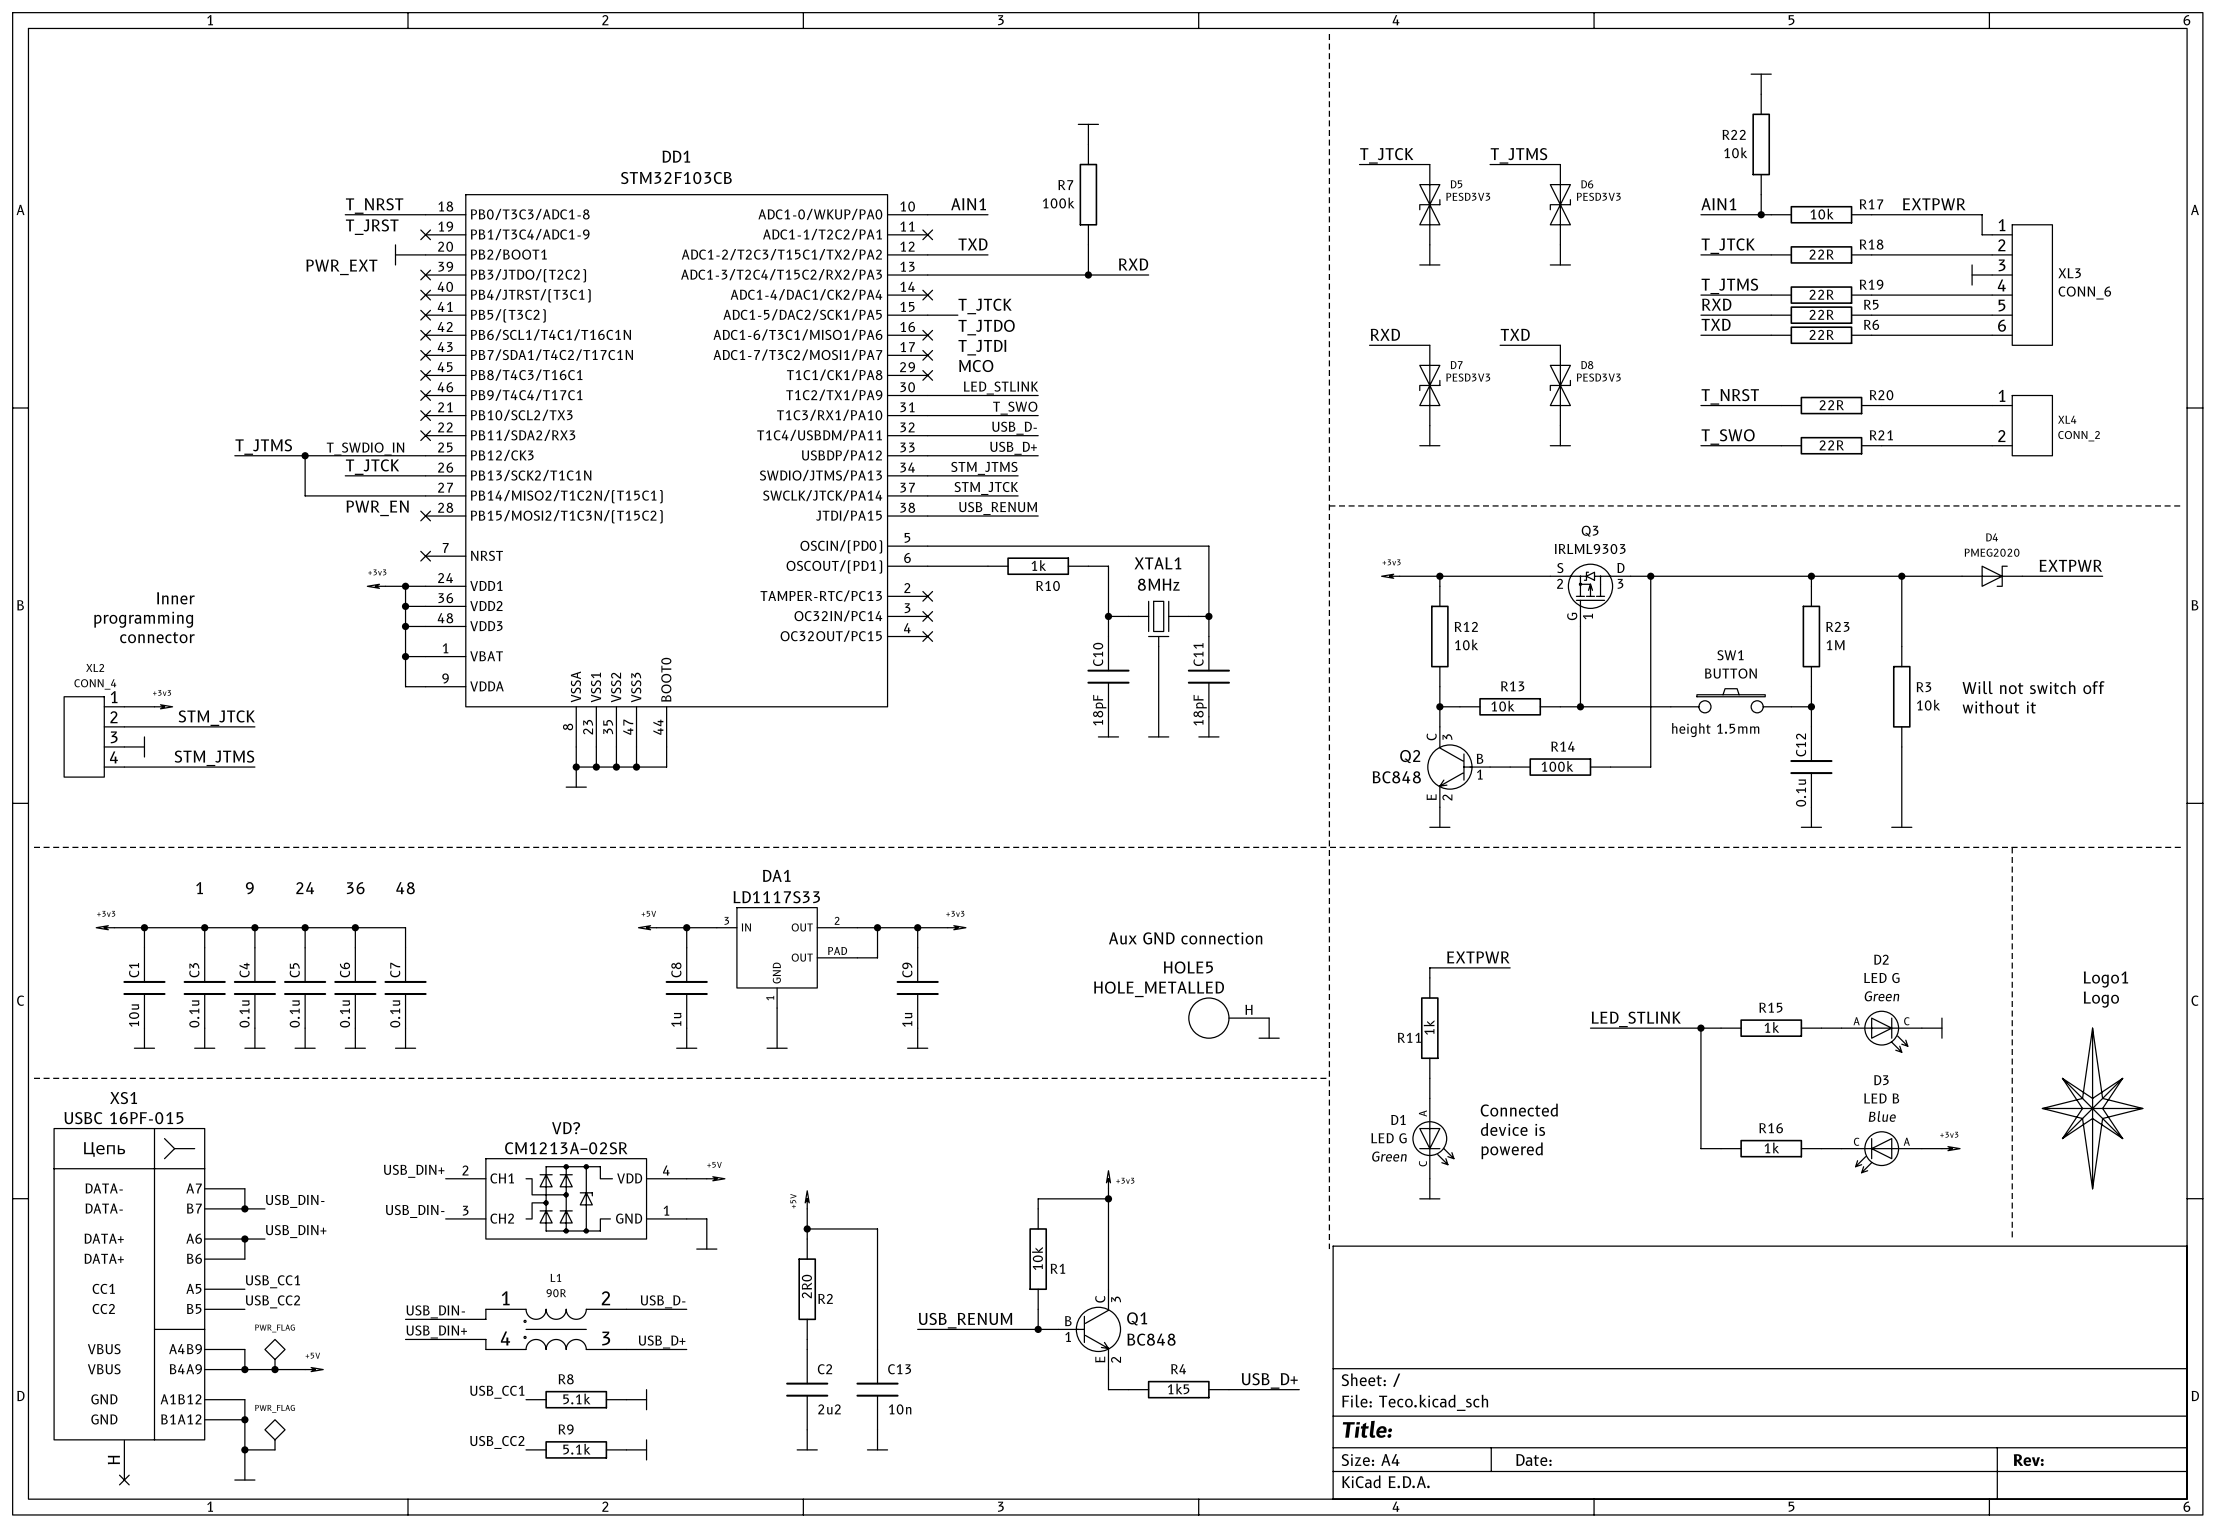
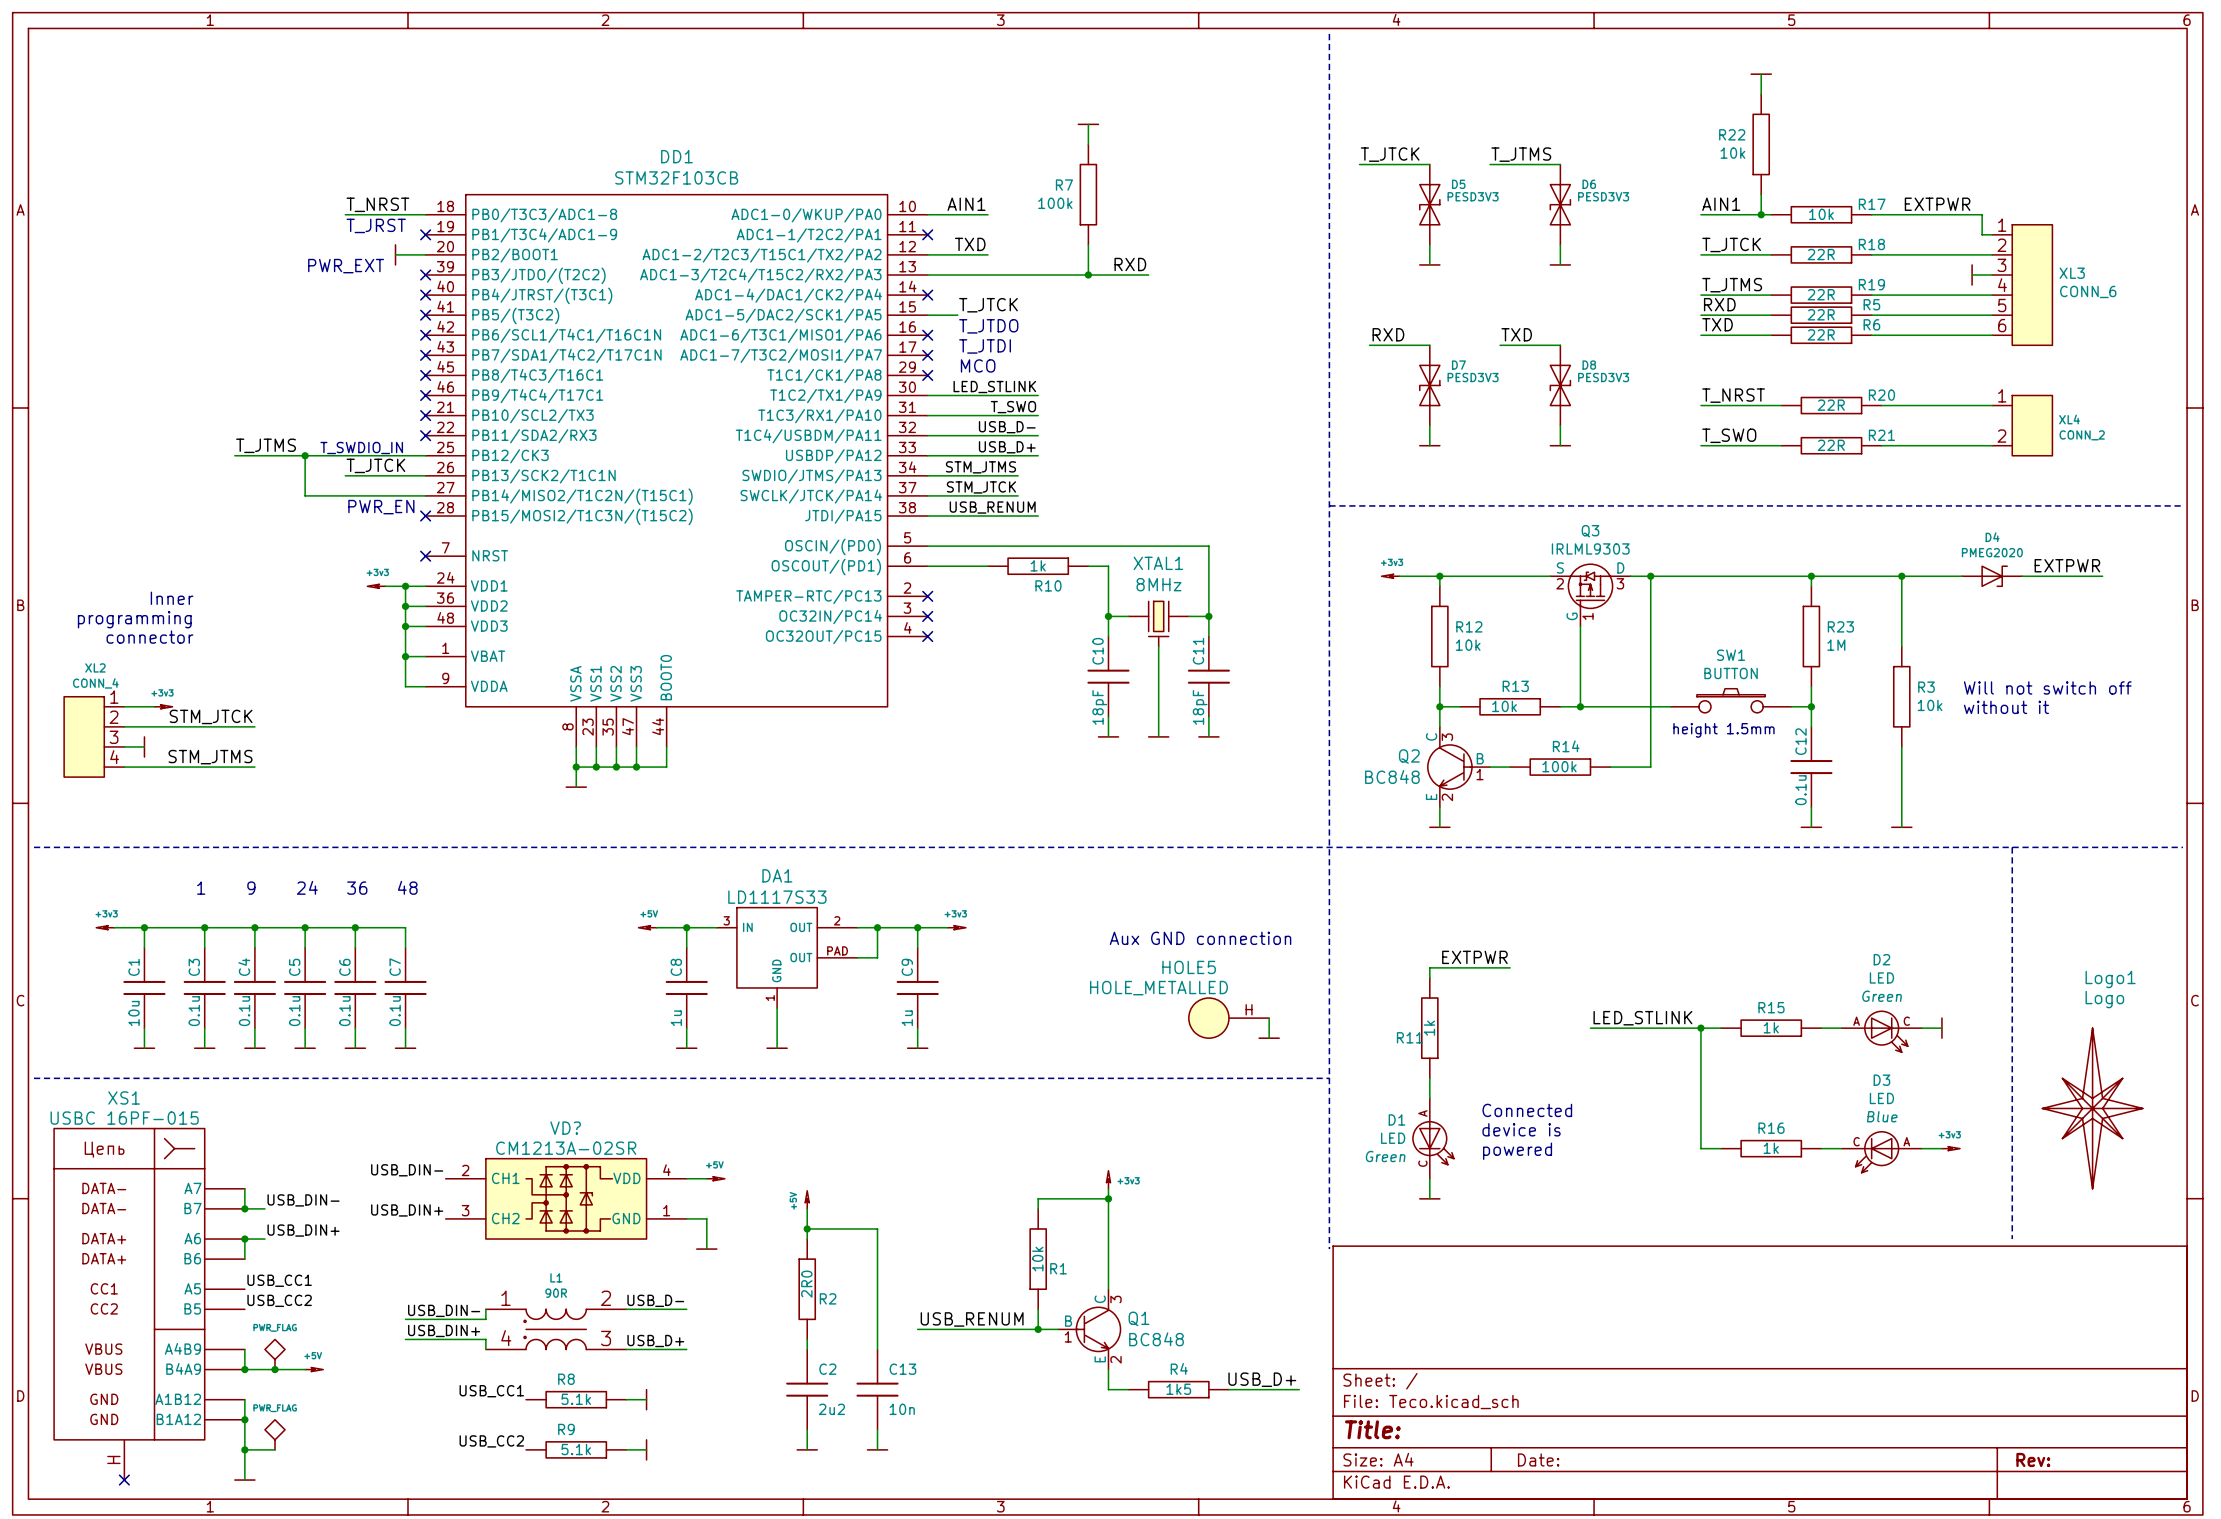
D2 value: LED G (1881, 978) -> LED (1881, 977)
D3 value: LED B (1881, 1098) -> LED (1881, 1098)
D1 value: LED G (1389, 1138) -> LED (1393, 1138)
label: USB_DIN+ (414, 1171) -> USB_DIN- (407, 1170)
label: USB_DIN- (415, 1211) -> USB_DIN+ (407, 1210)

